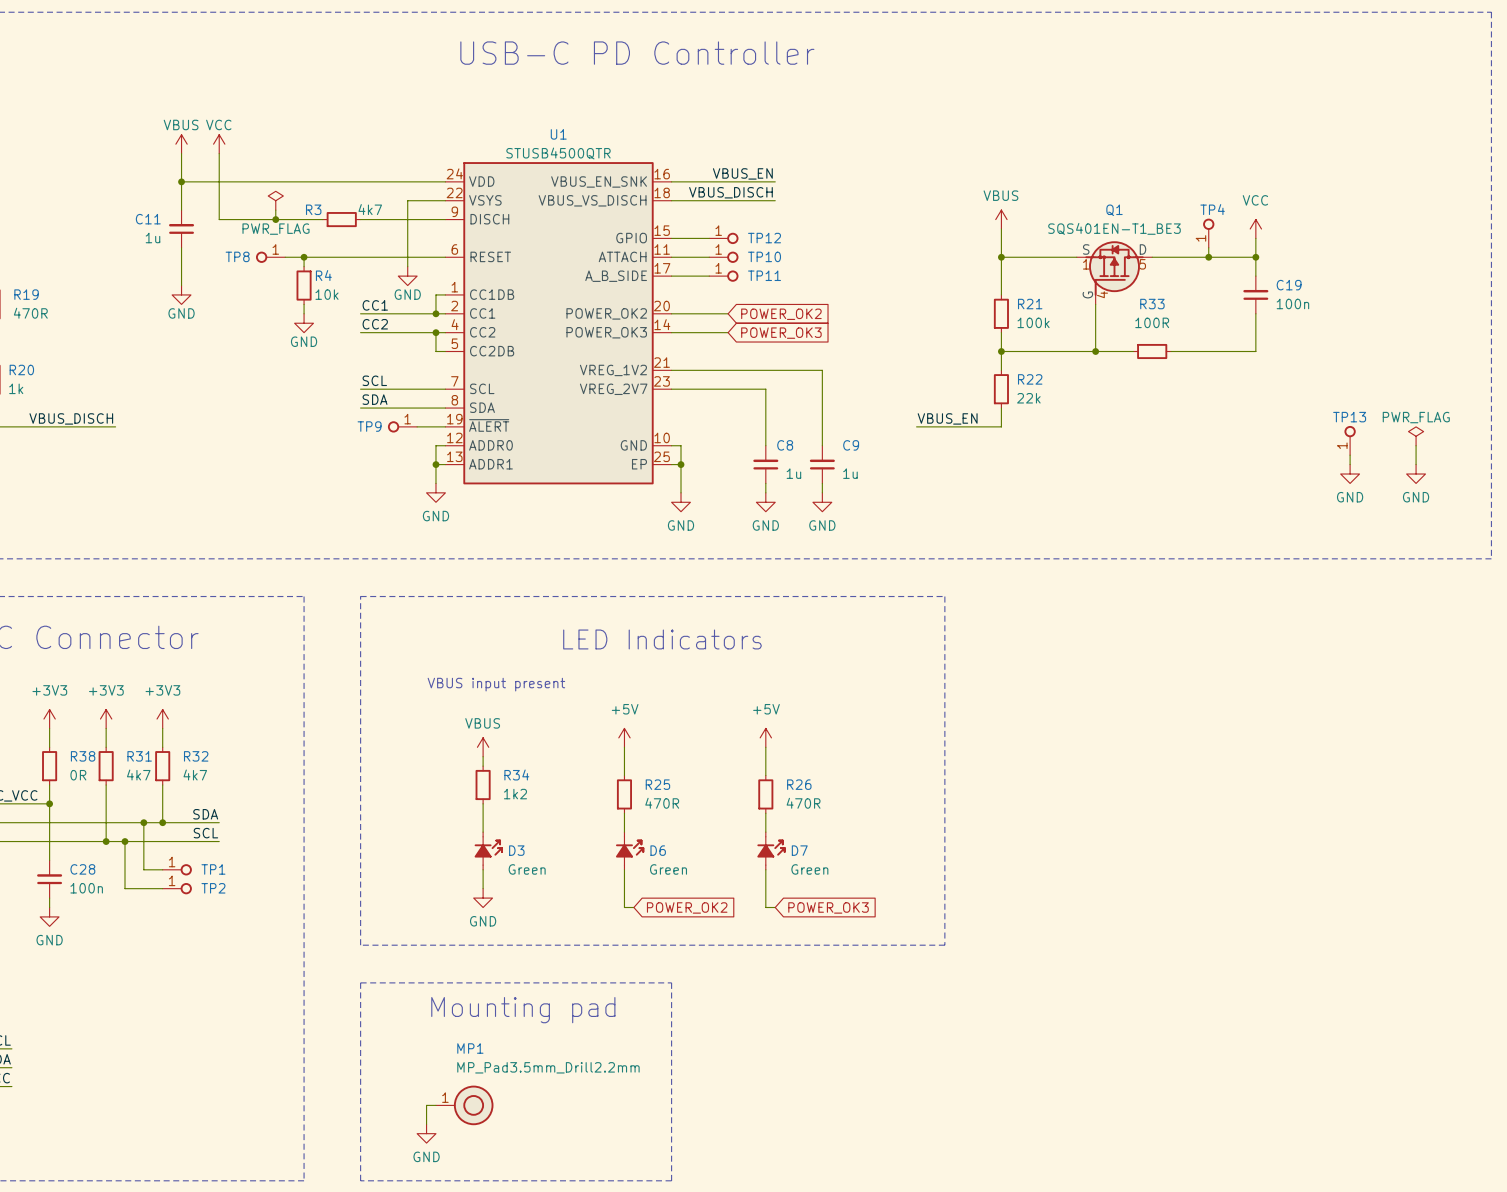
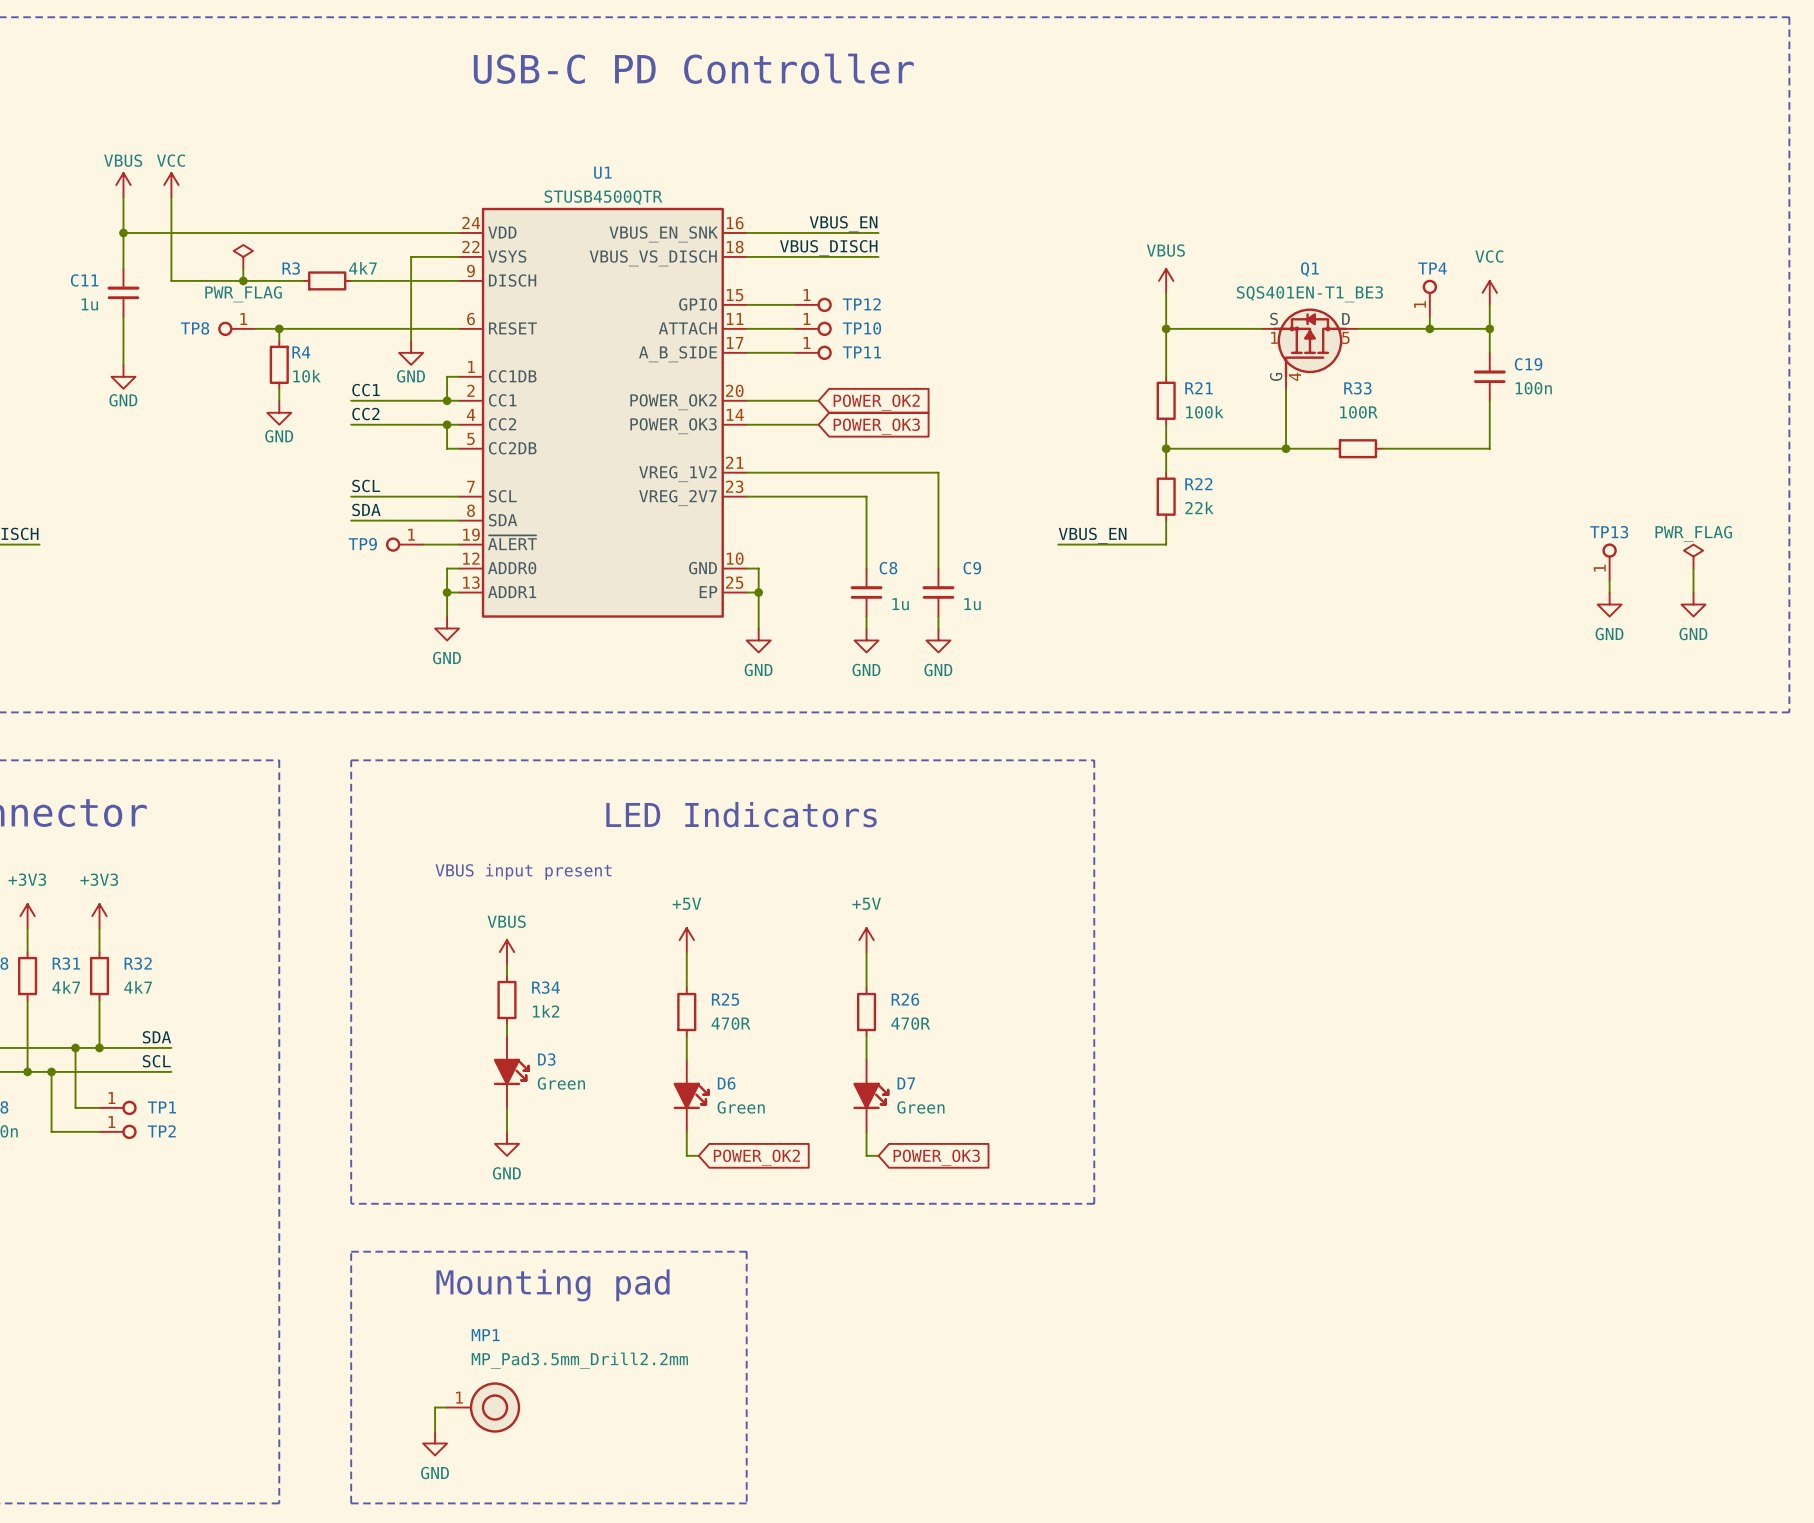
D3 symbol: [474, 832, 503, 870] -> [493, 1035, 530, 1108]
D6 symbol: [615, 832, 645, 870] -> [673, 1059, 710, 1132]
D7 symbol: [757, 832, 786, 870] -> [853, 1059, 890, 1132]

